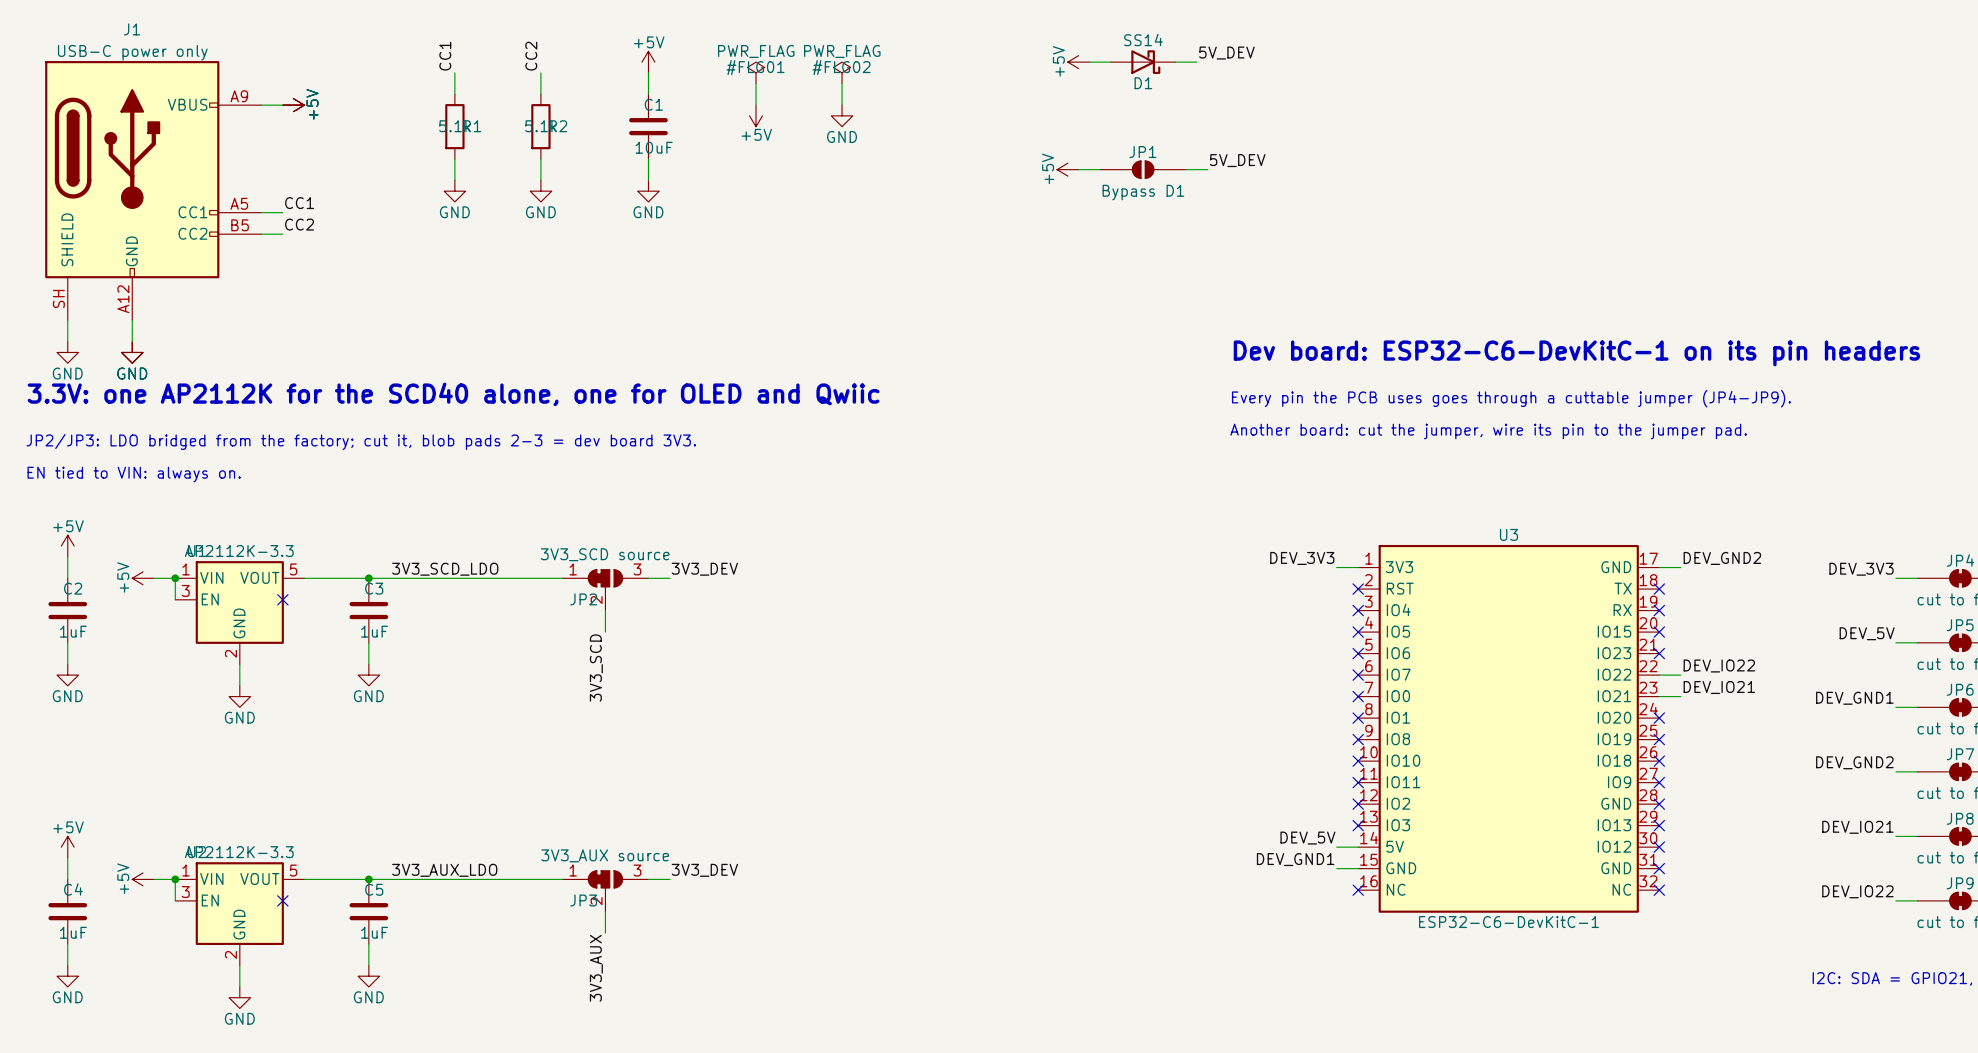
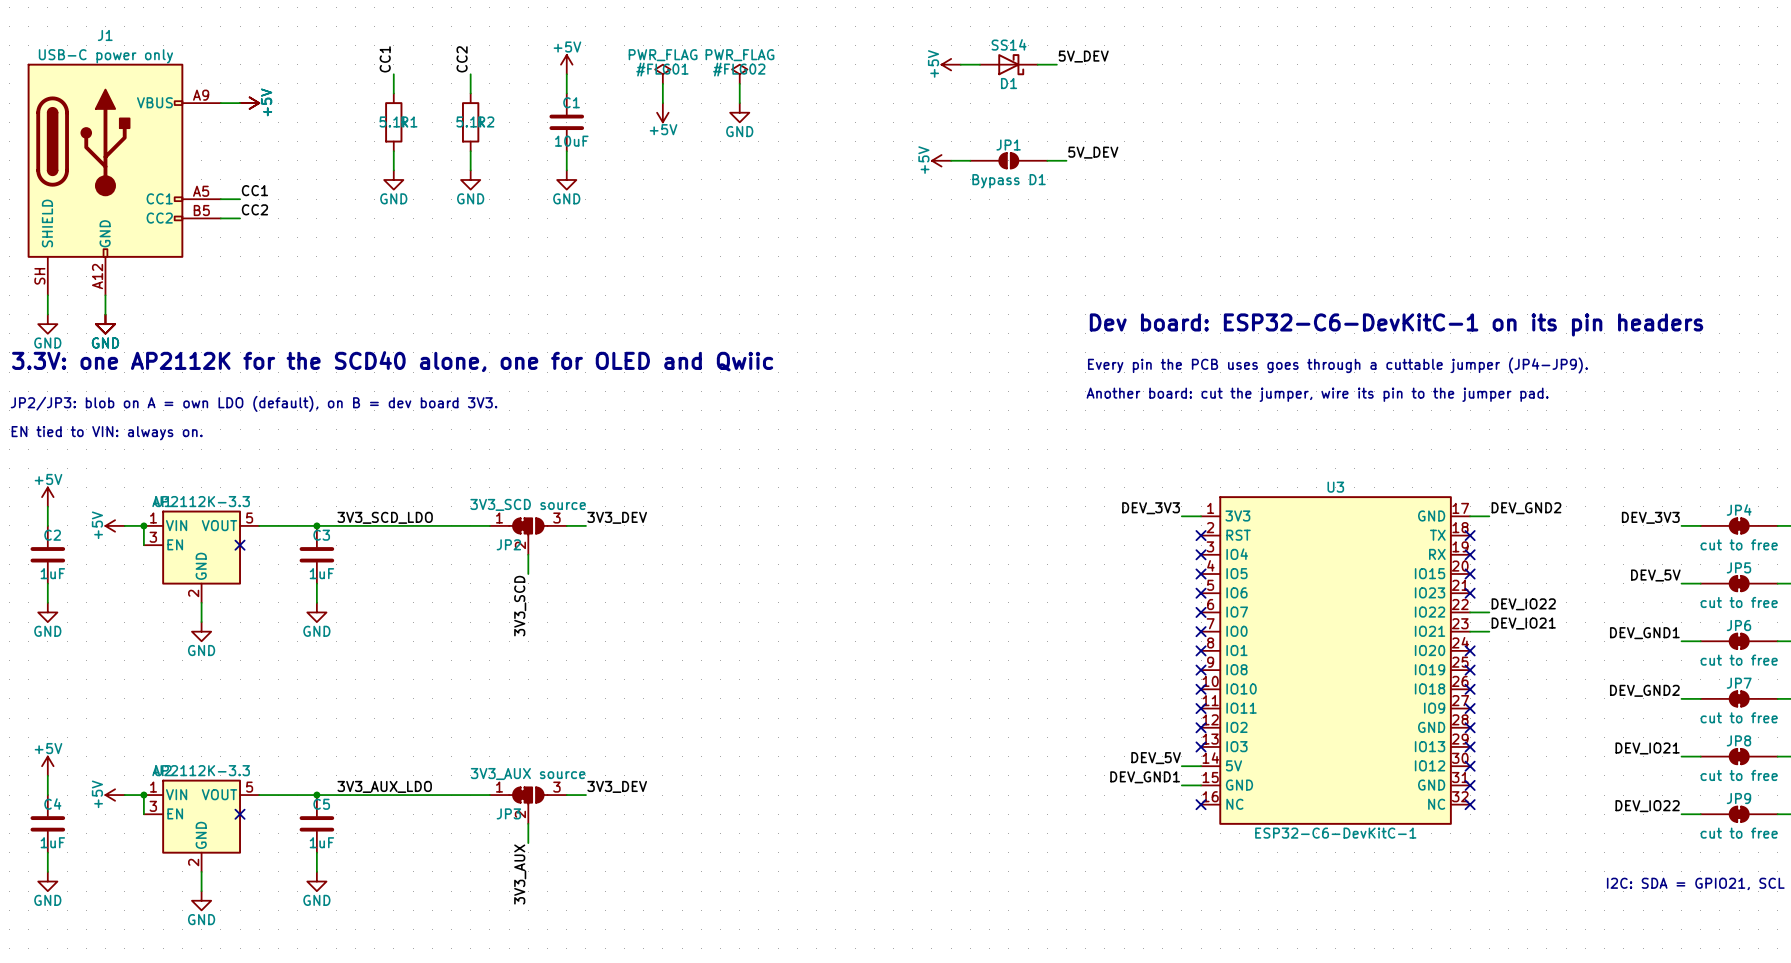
text: JP2/JP3: LDO bridged from the factory; cut it, blob pads 2-3 = dev board 3V3. (361, 441) -> JP2/JP3: blob on A = own LDO (default), on B = dev board 3V3. (254, 403)

